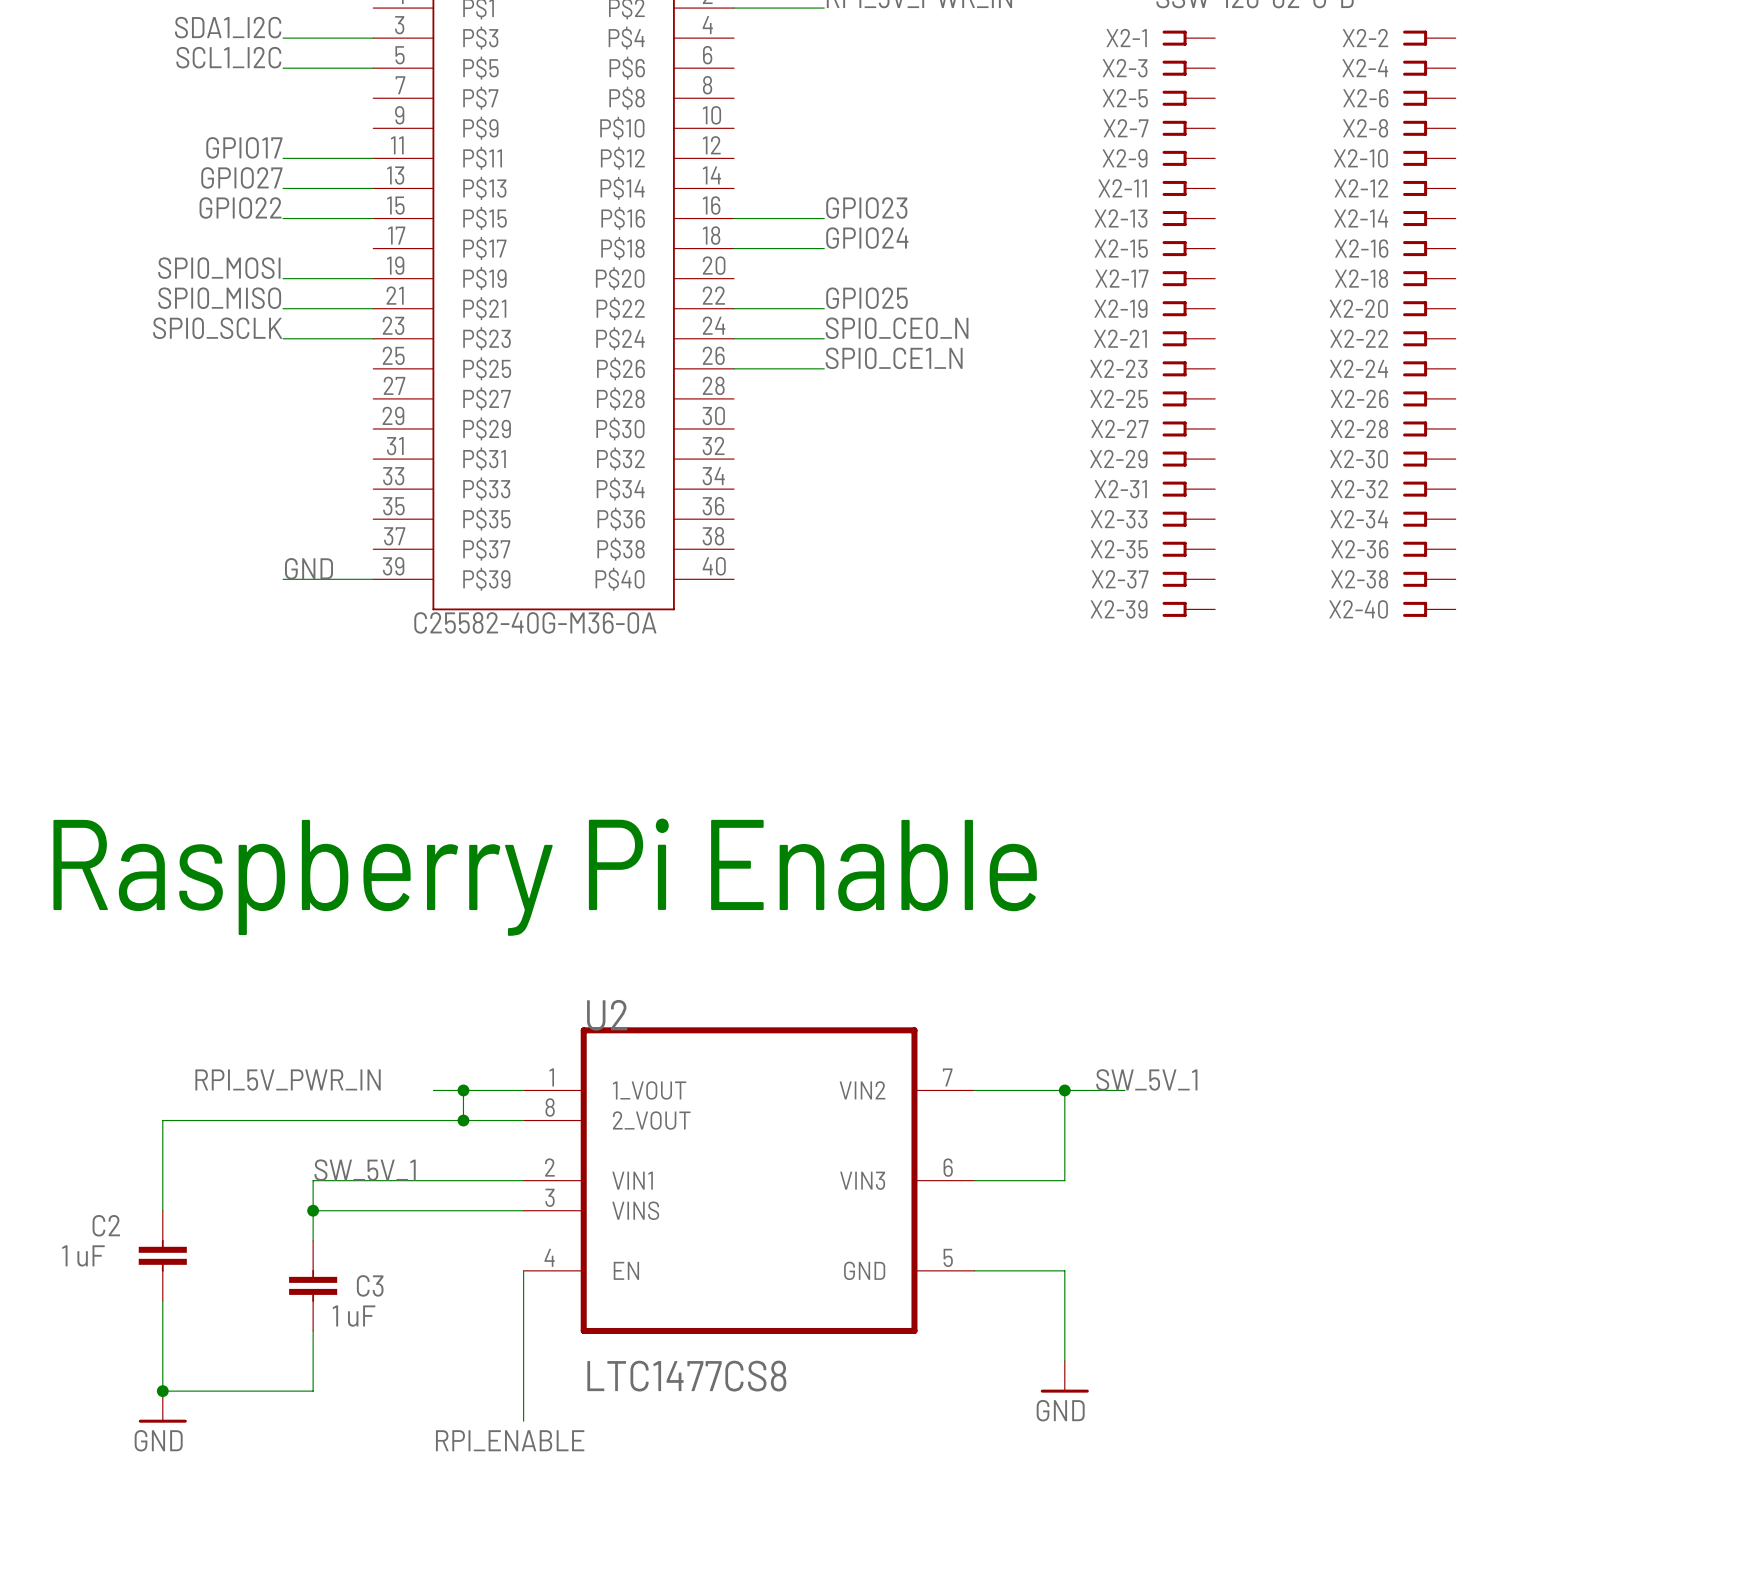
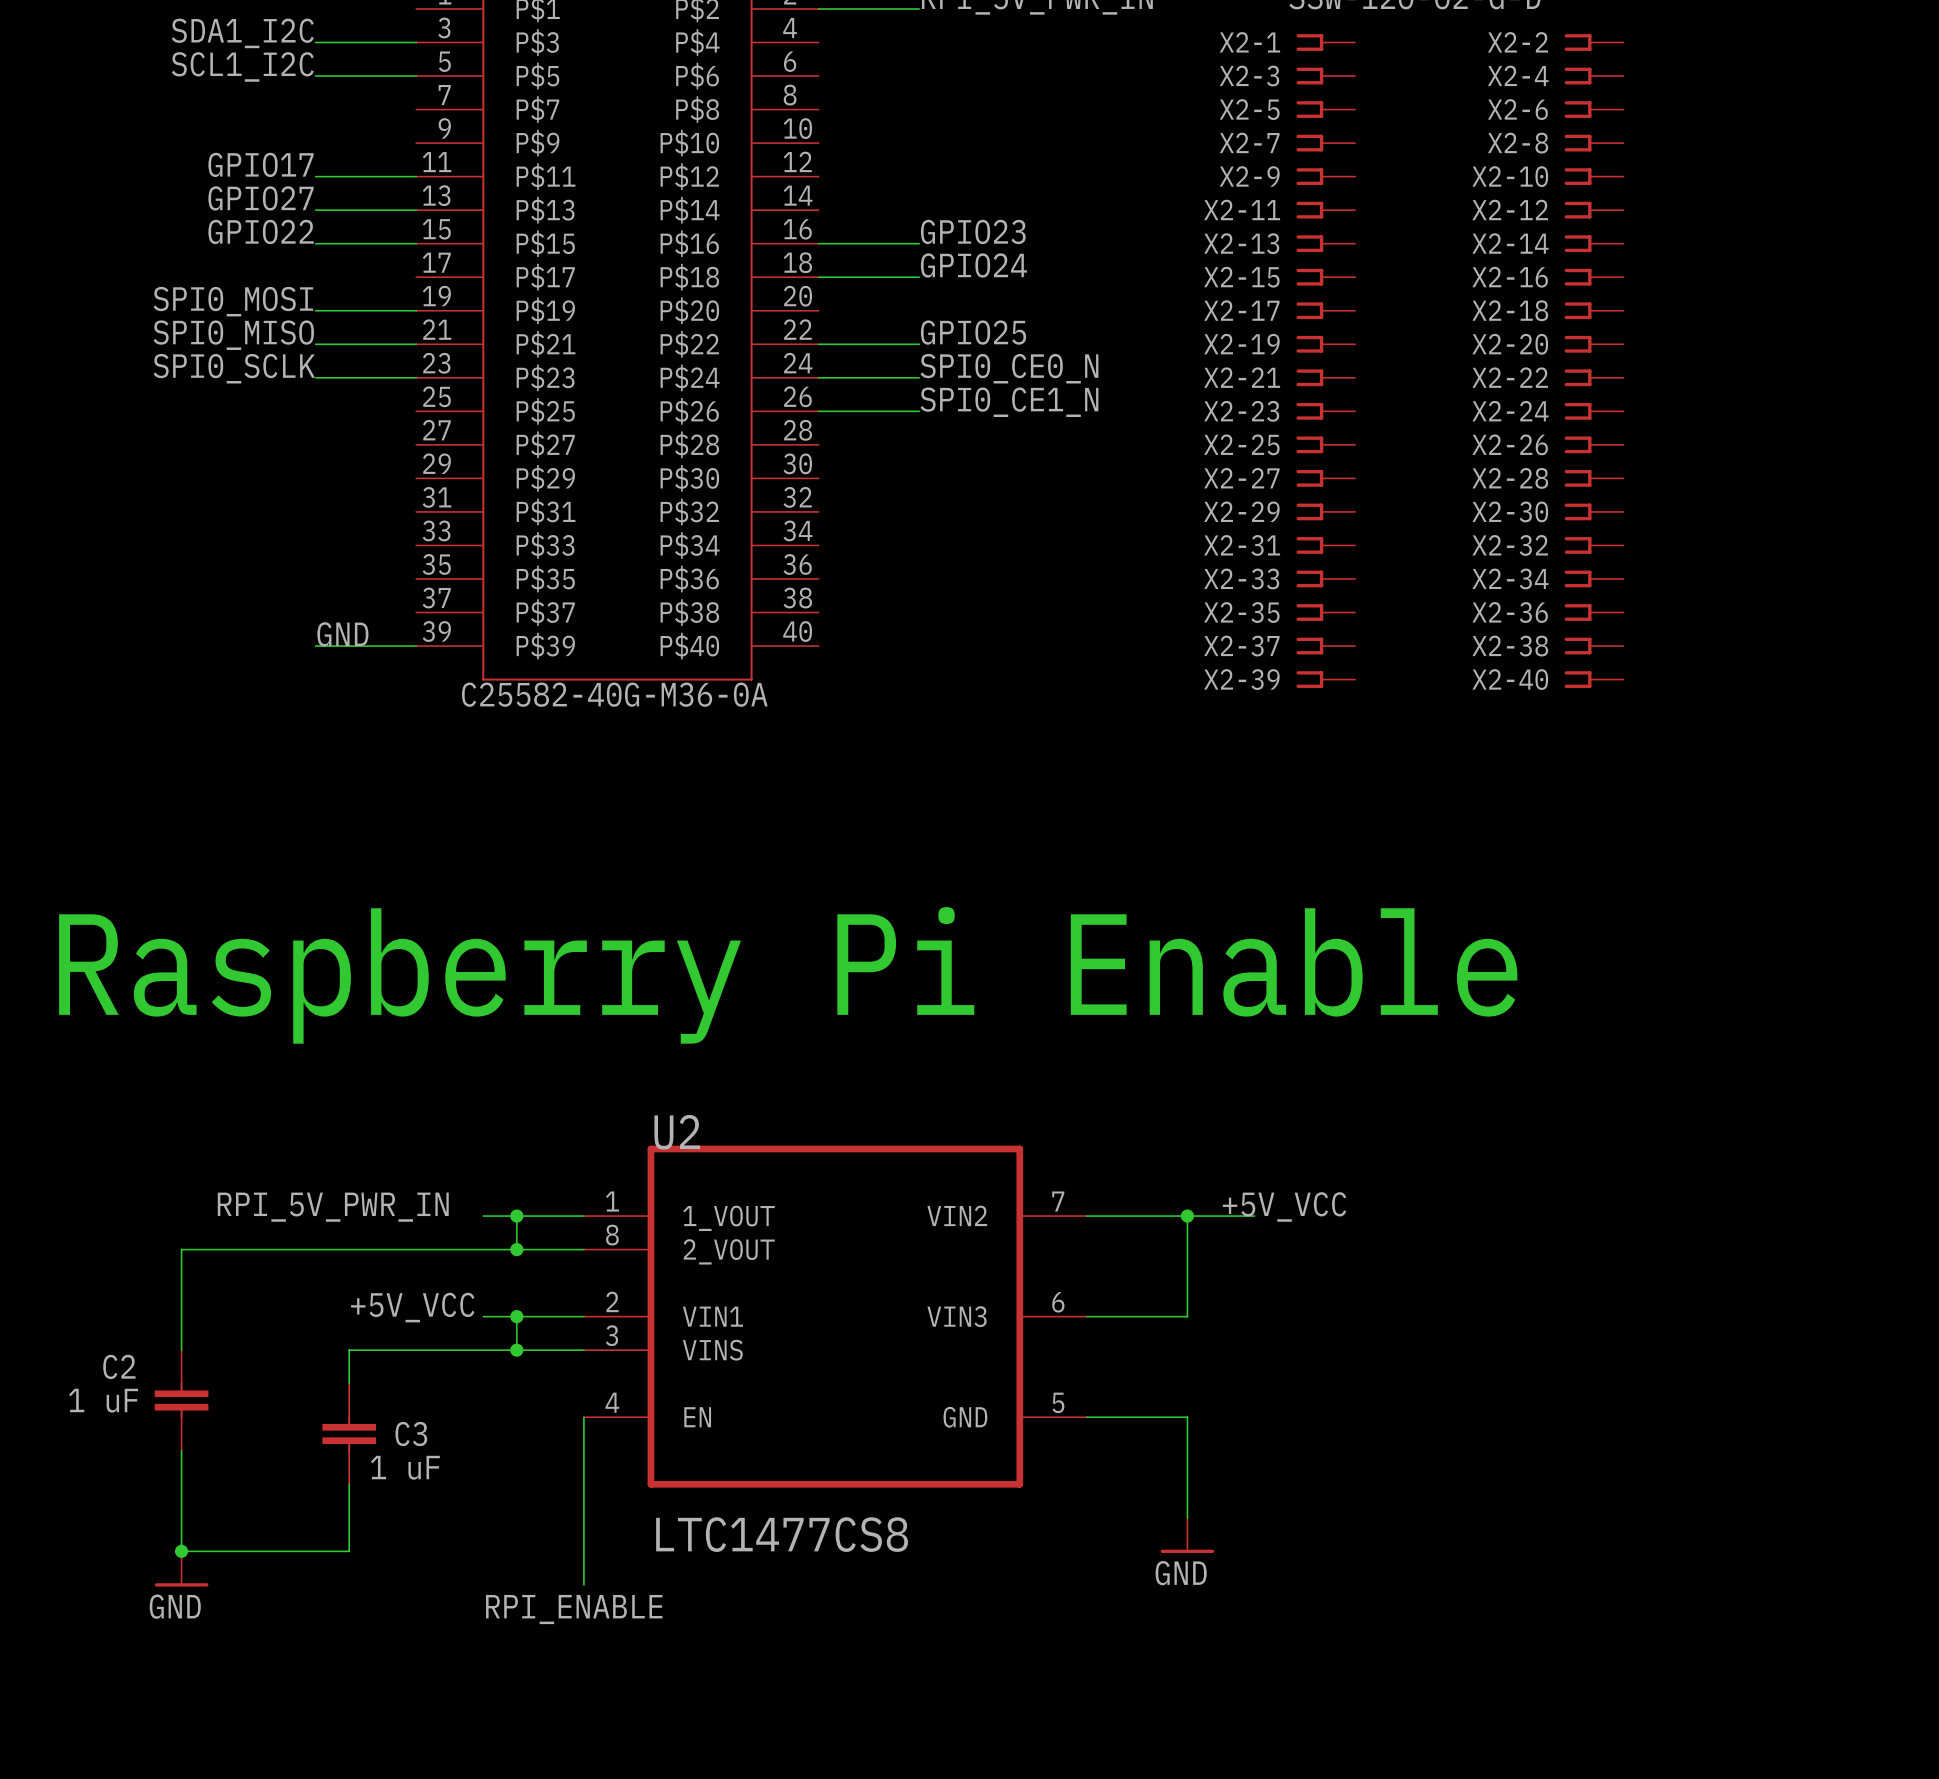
label: SW_5V_1 (1146, 1079) -> +5V_VCC (1284, 1206)
label: SW_5V_1 (365, 1170) -> +5V_VCC (412, 1307)
wire: (433, 1180) (313, 1180) (313, 1210) -> none
wire: none -> (516, 1316) (516, 1350)
junction: none -> (516, 1316)
junction: (313, 1210) -> none
junction: none -> (516, 1350)

